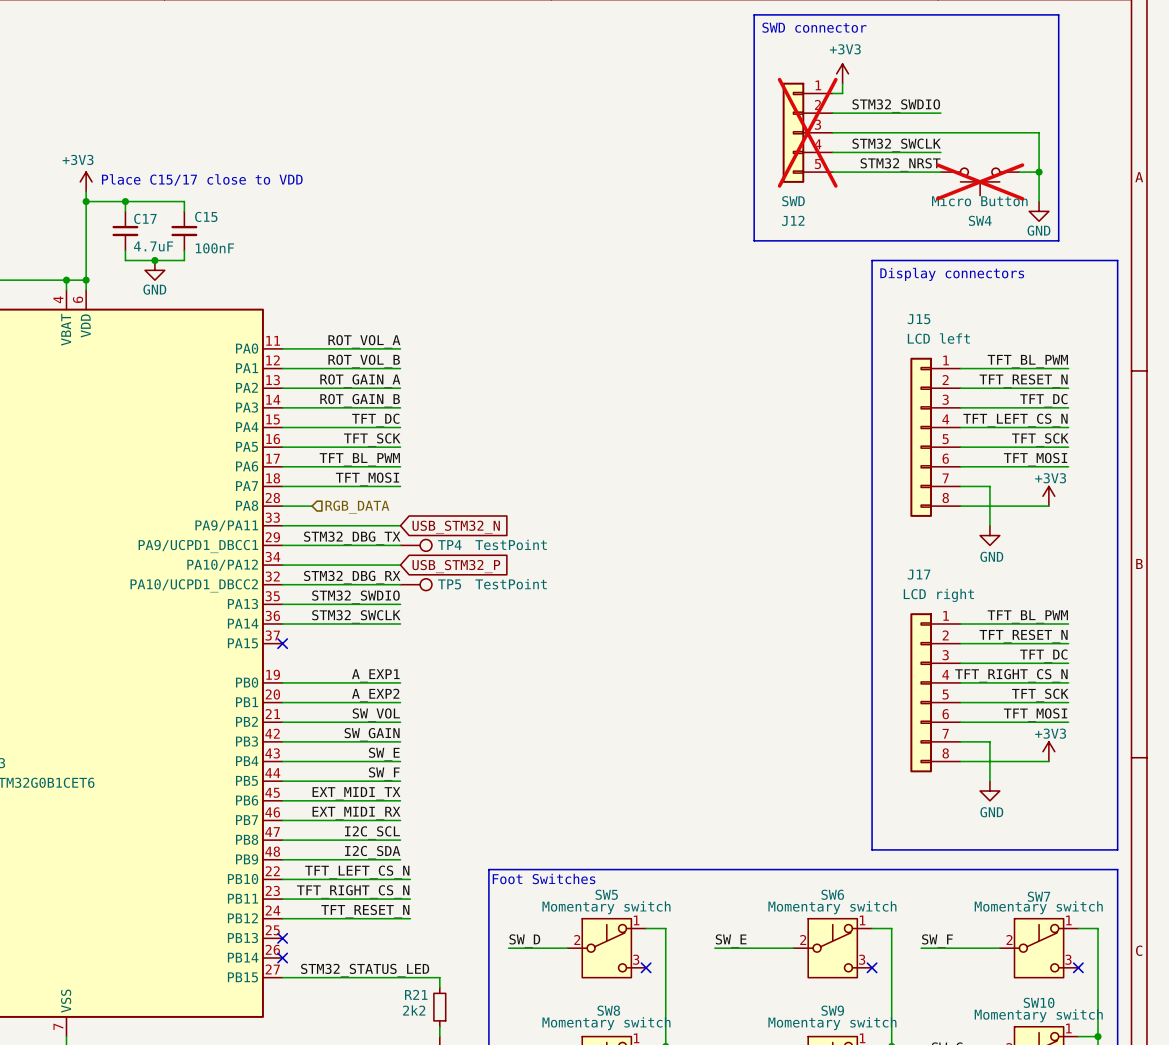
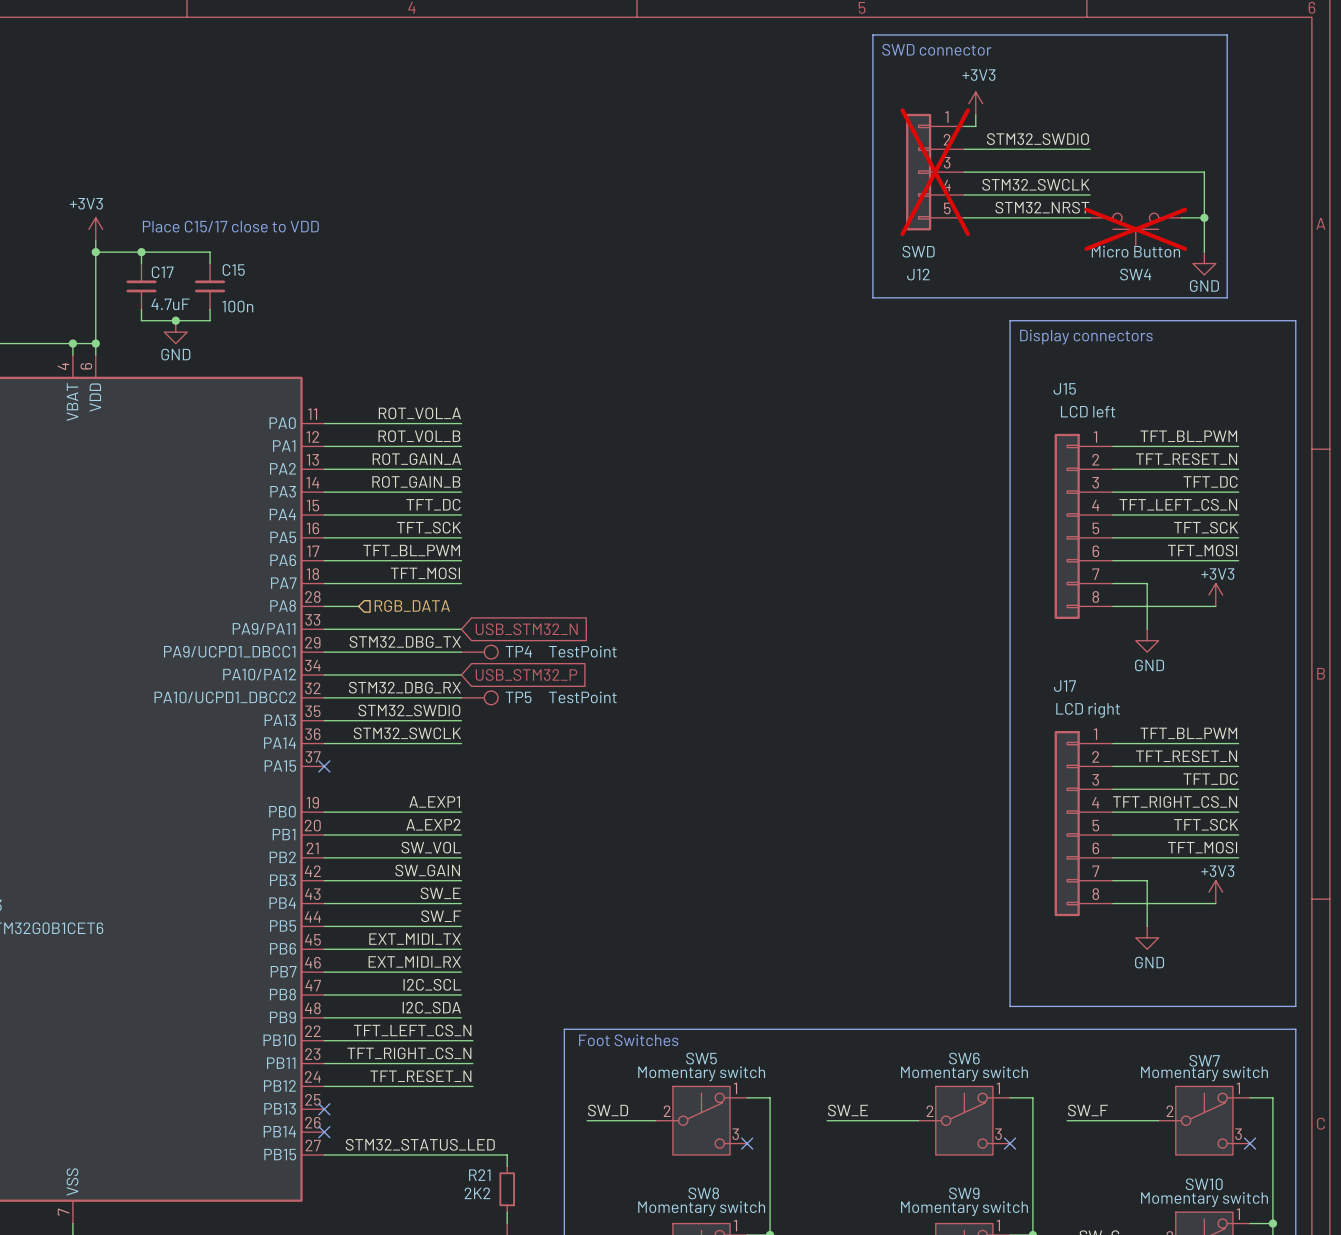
C15 value: 100nF (214, 248) -> 100n (237, 306)
R21 value: 2k2 (414, 1010) -> 2K2 (477, 1193)

